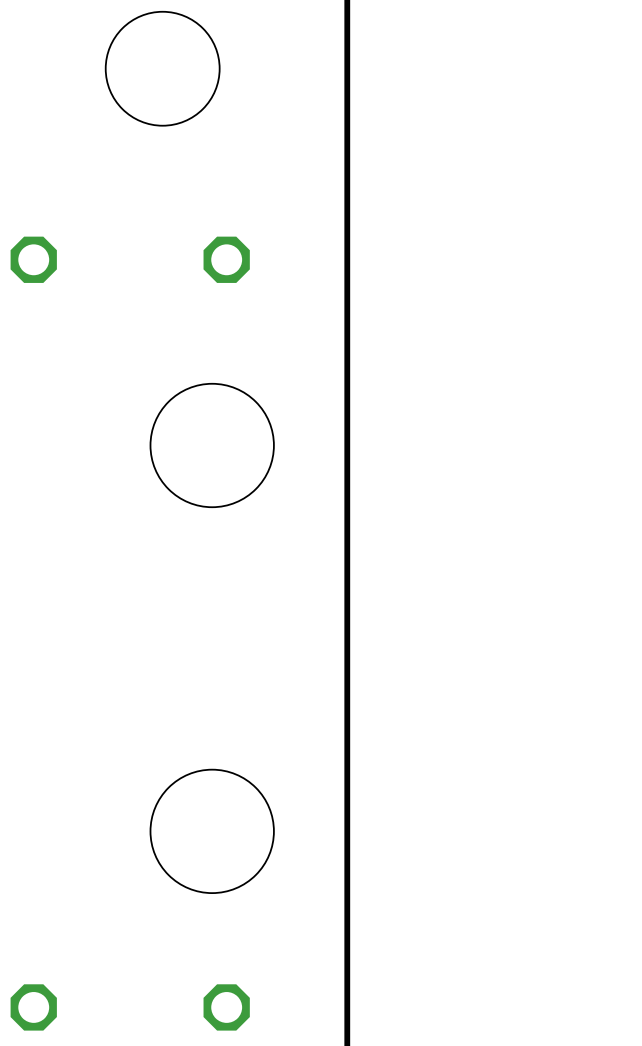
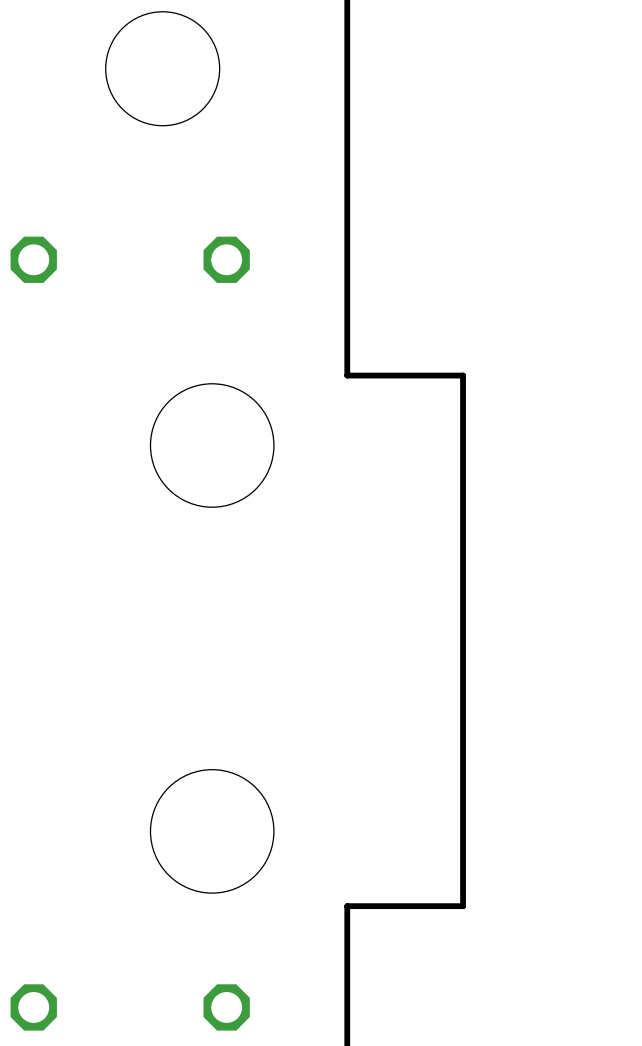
board edge: (347, 375) (347, 906) -> (347, 375) (463, 375) (463, 906) (347, 906)

